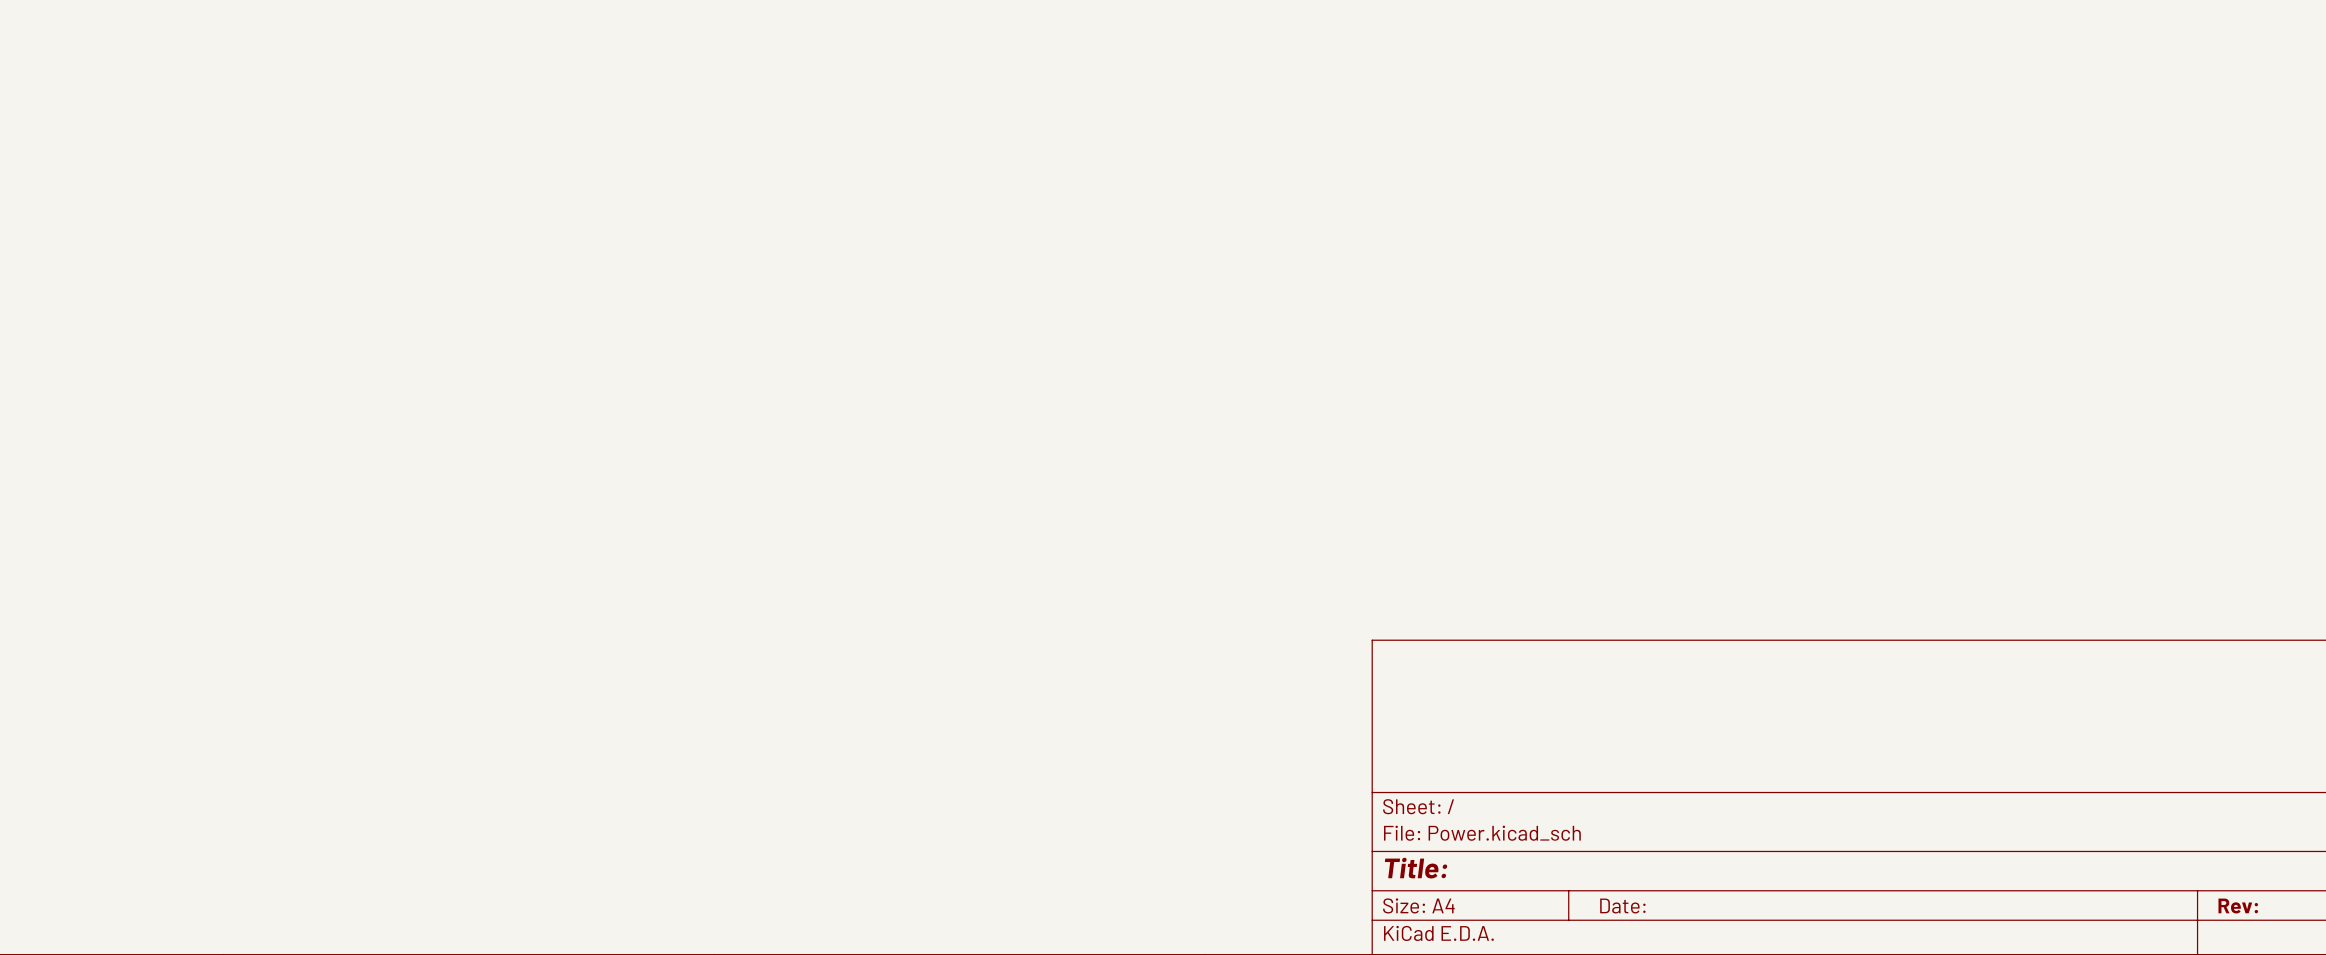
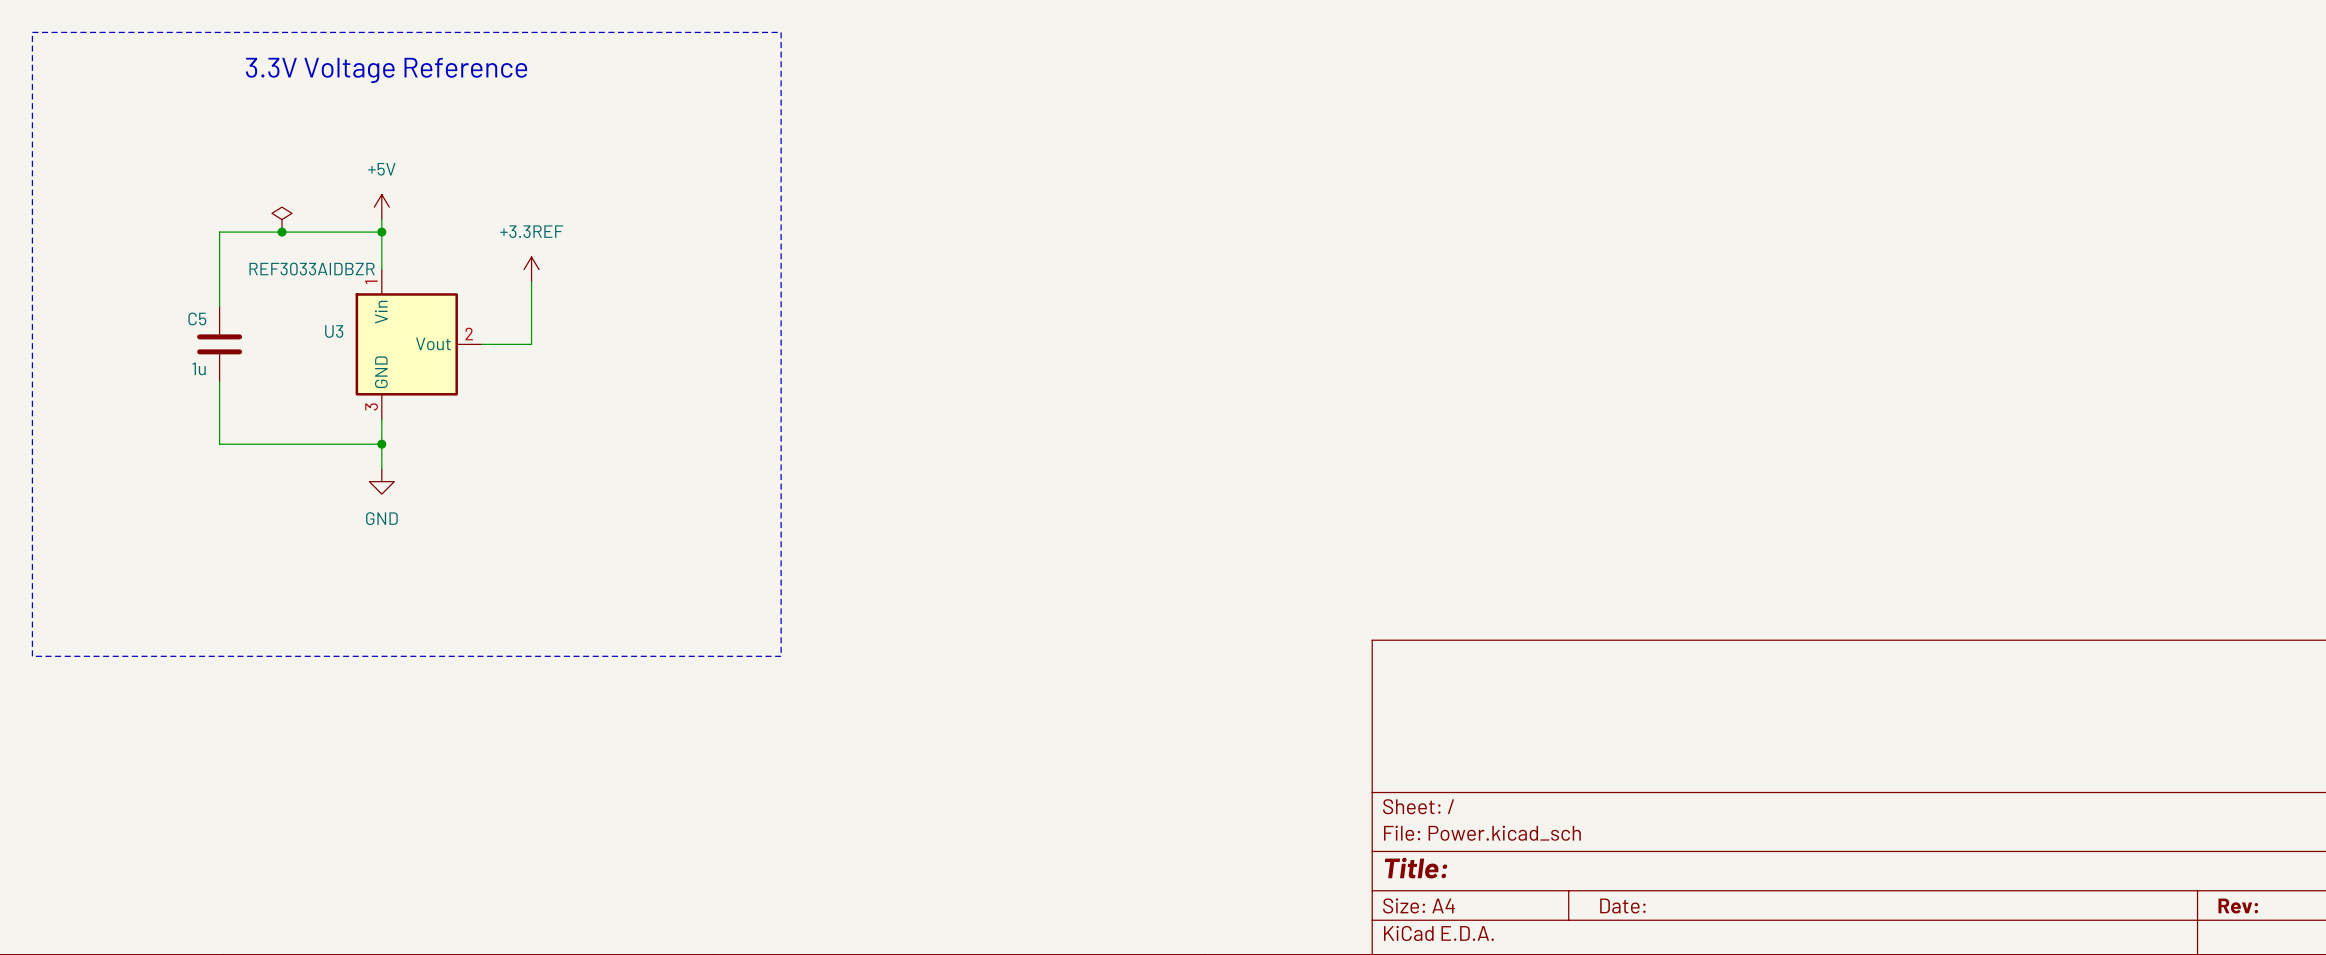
line: none -> (32, 32) (781, 32) (781, 656) (32, 656) (32, 32)
text: none -> 3.3V Voltage Reference (386, 70)
power symbol: none -> +5V (381, 207)
power symbol: none -> (281, 219)
wire: none -> (381, 219) (381, 269)
junction: none -> (281, 232)
wire: none -> (381, 232) (219, 232) (219, 306)
junction: none -> (381, 232)
power symbol: none -> +3.3REF (531, 269)
wire: none -> (531, 281) (531, 344) (481, 344)
C5: none -> 1u (219, 344)
U3: none -> REF3033AIDBZR (418, 344)
wire: none -> (219, 381) (219, 444) (381, 444)
wire: none -> (381, 419) (381, 469)
junction: none -> (381, 444)
power symbol: none -> GND (381, 481)

